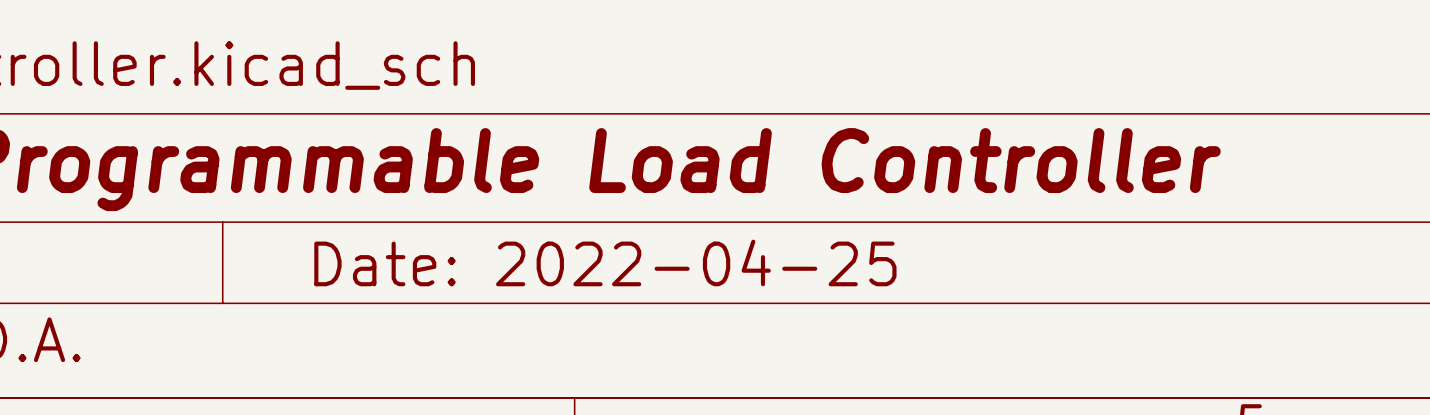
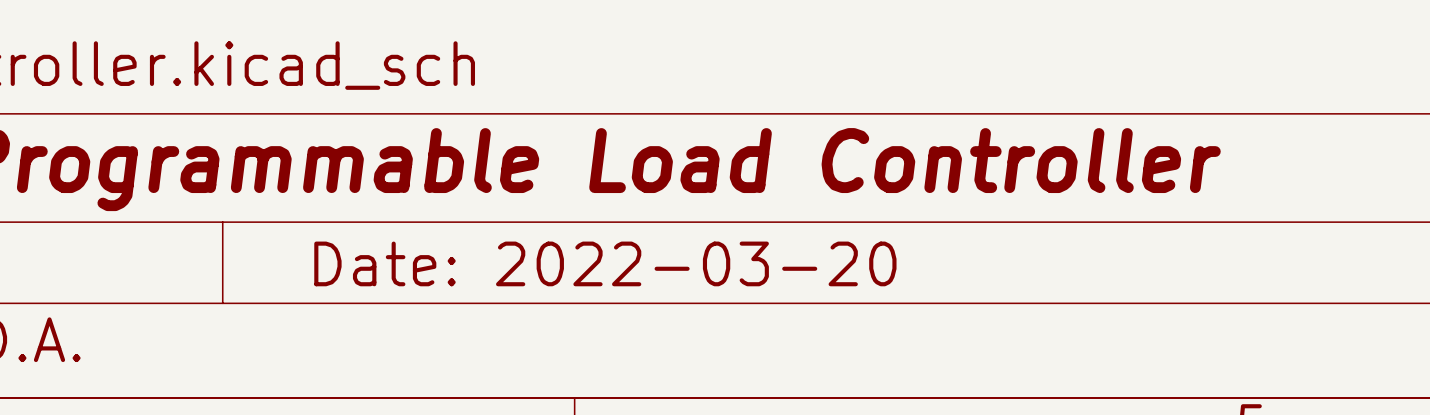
title block: Date: 2022-04-25 (605, 262) -> Date: 2022-03-20 (605, 263)

